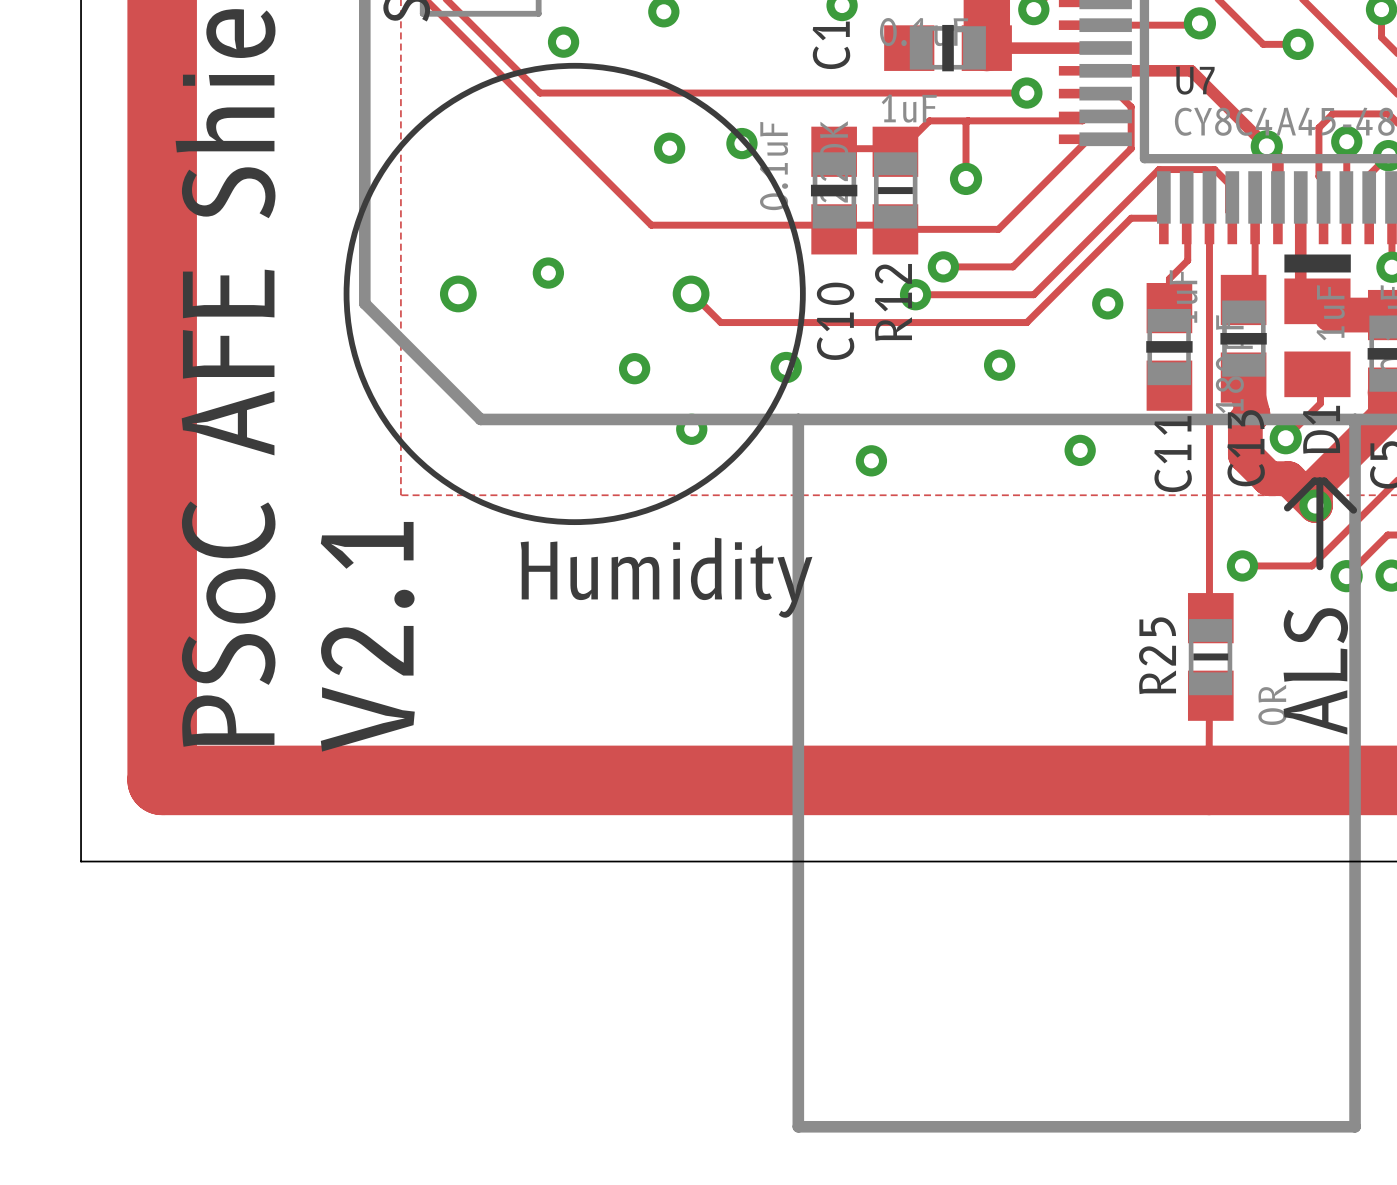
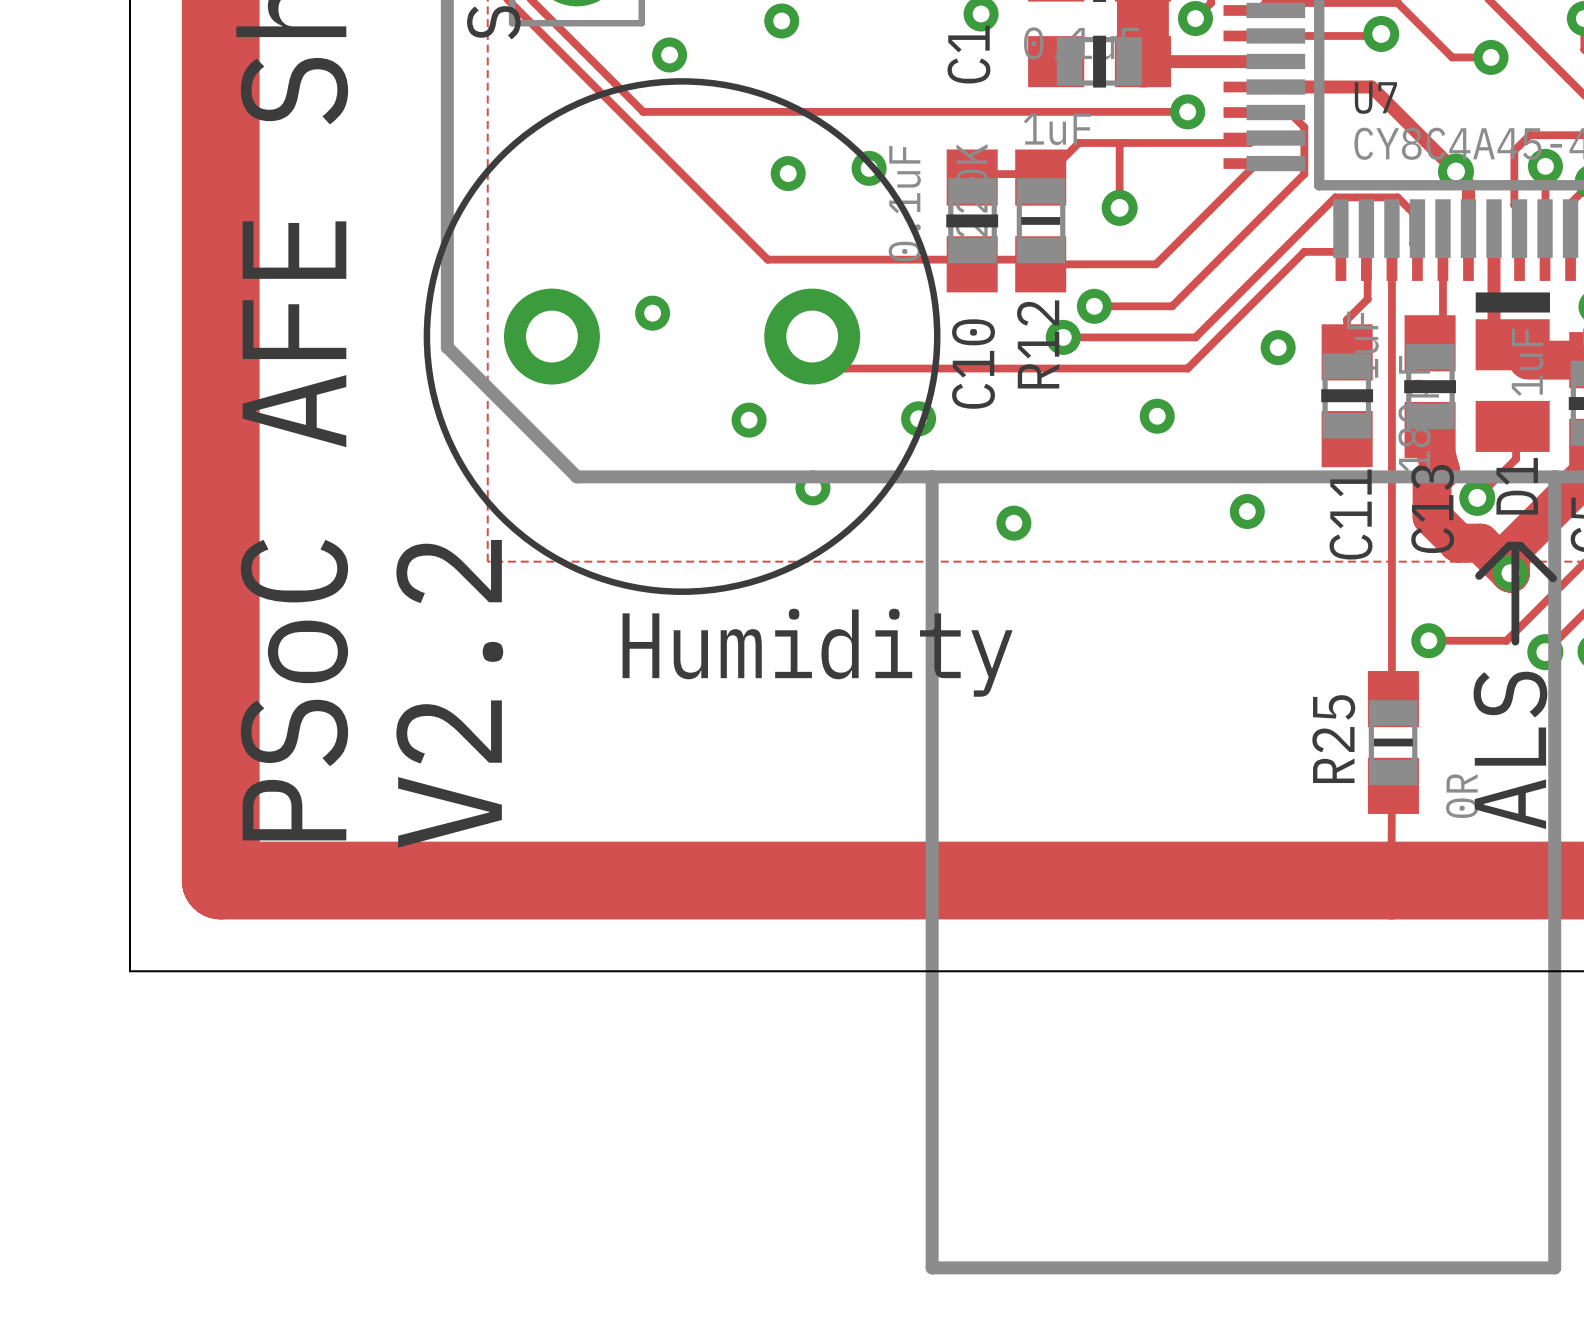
part footprint: [343, 62, 806, 526] -> [423, 78, 941, 595]
text: V2.1 (367, 636) -> V2.2 (449, 693)

